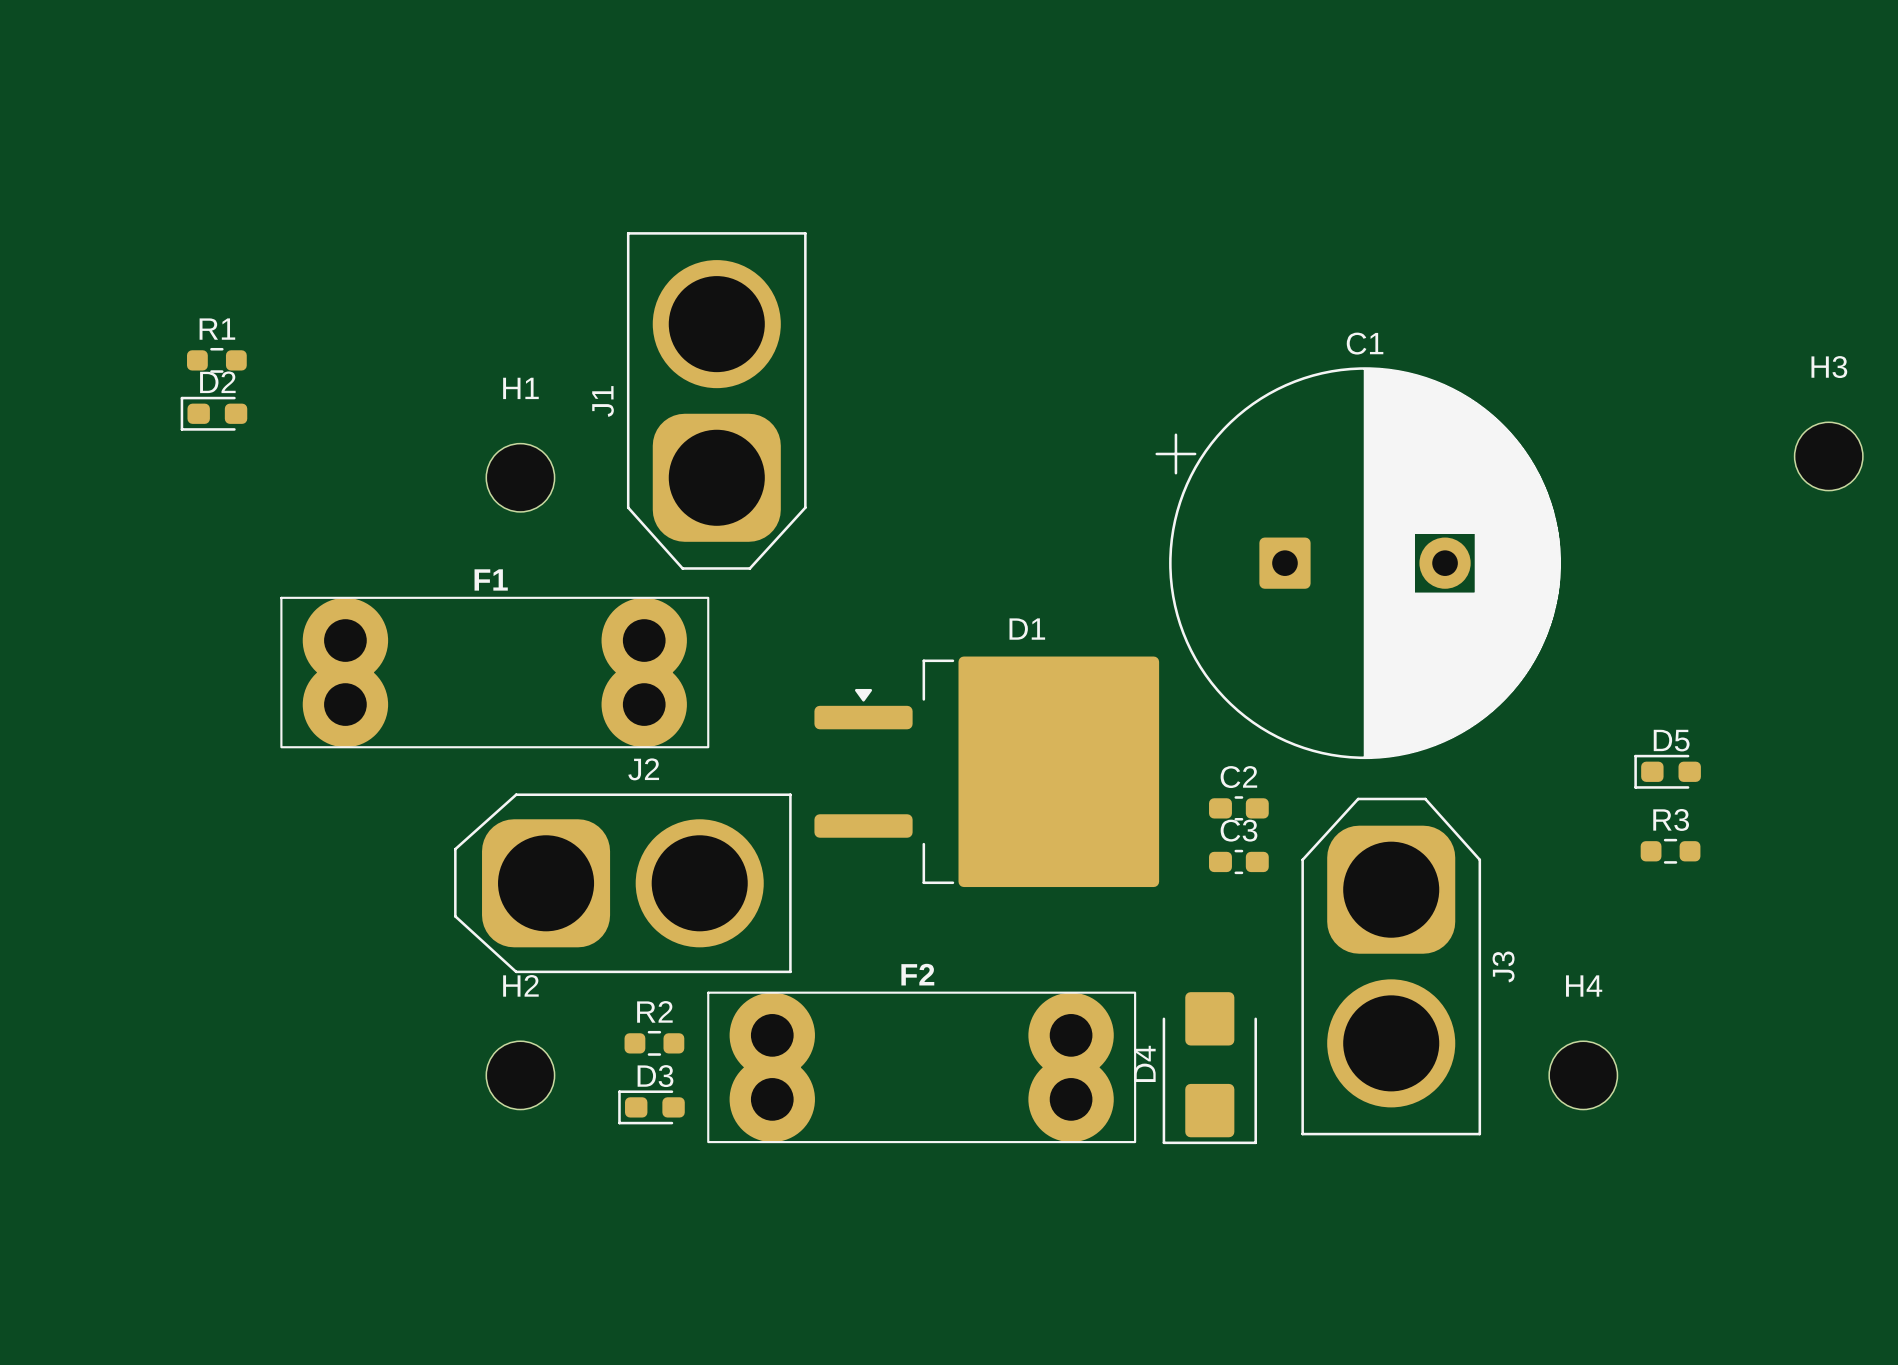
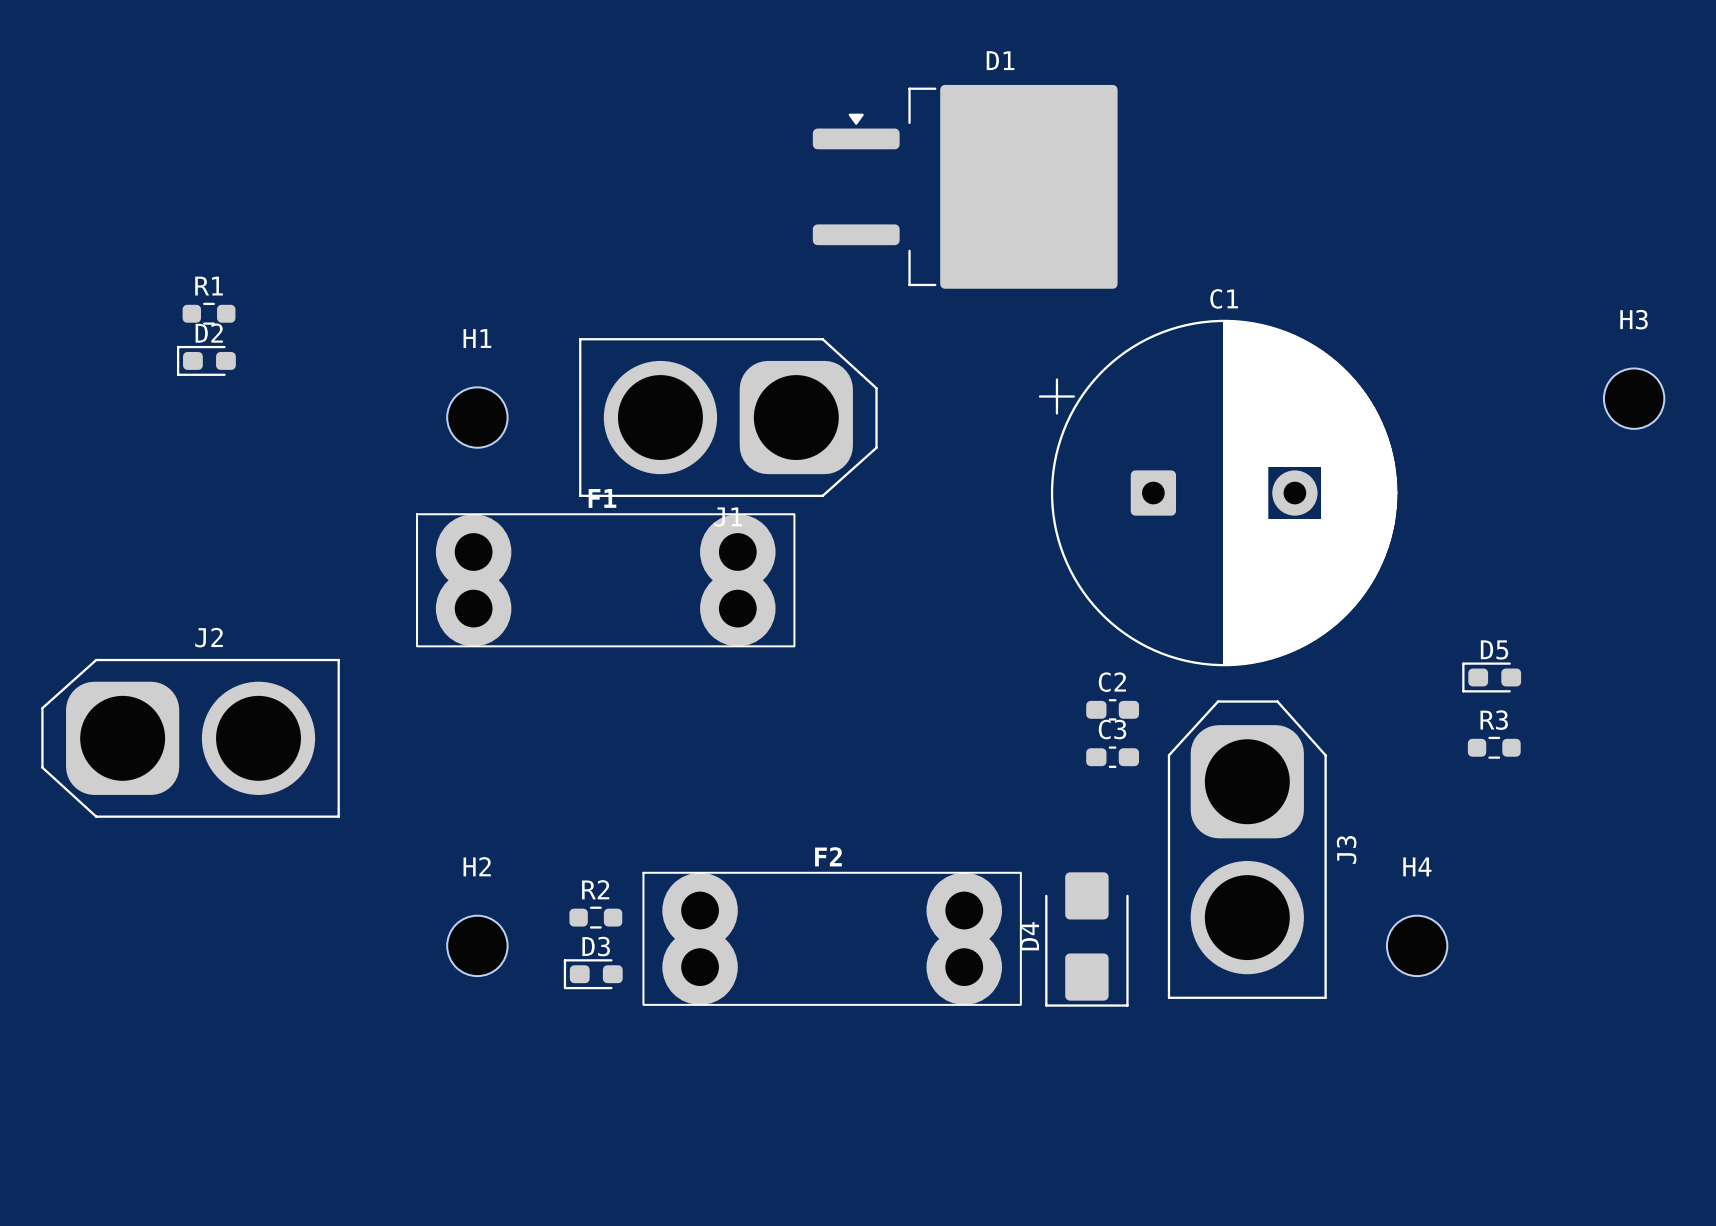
J1 rotation: 0° (716, 400) -> 90° counterclockwise (728, 417)
F1 position: (494, 672) -> (605, 580)
D1 position: (986, 771) -> (965, 186)
J2 position: (622, 883) -> (190, 738)

